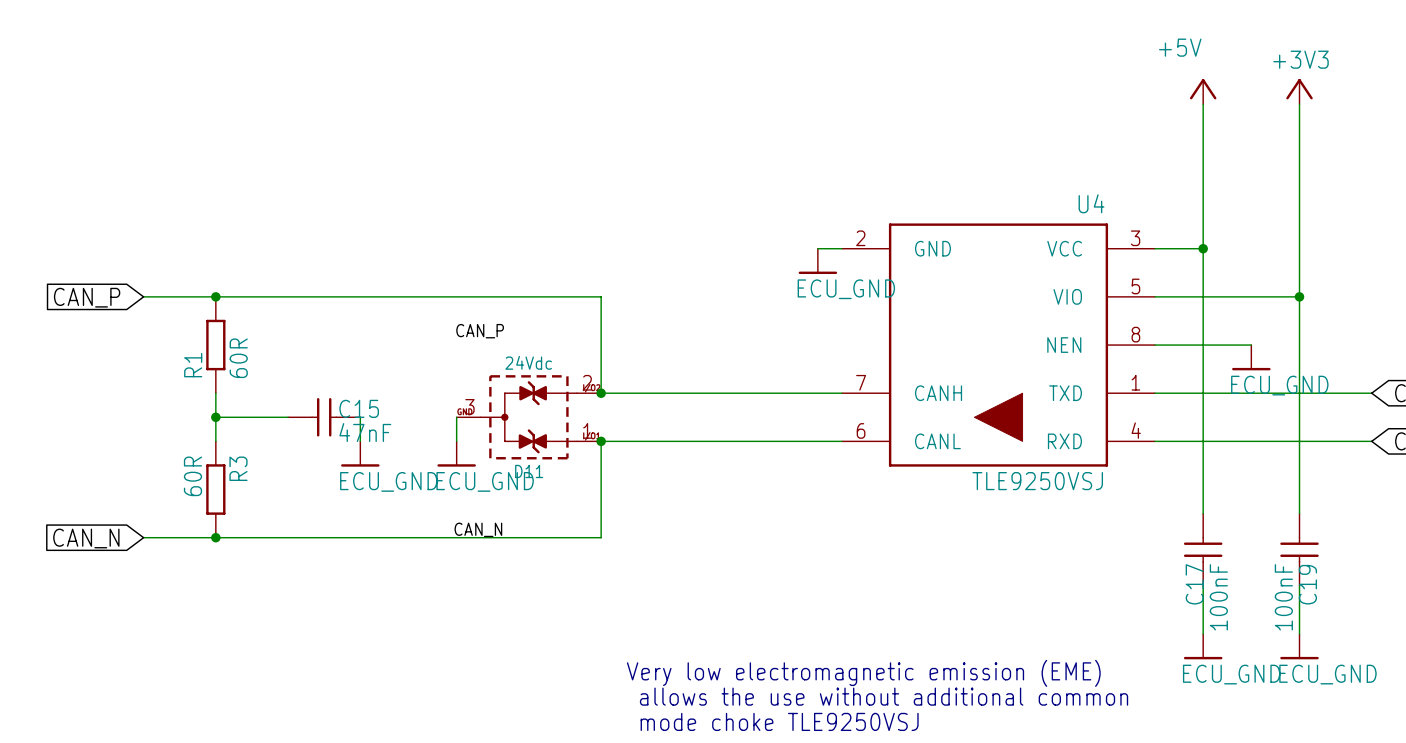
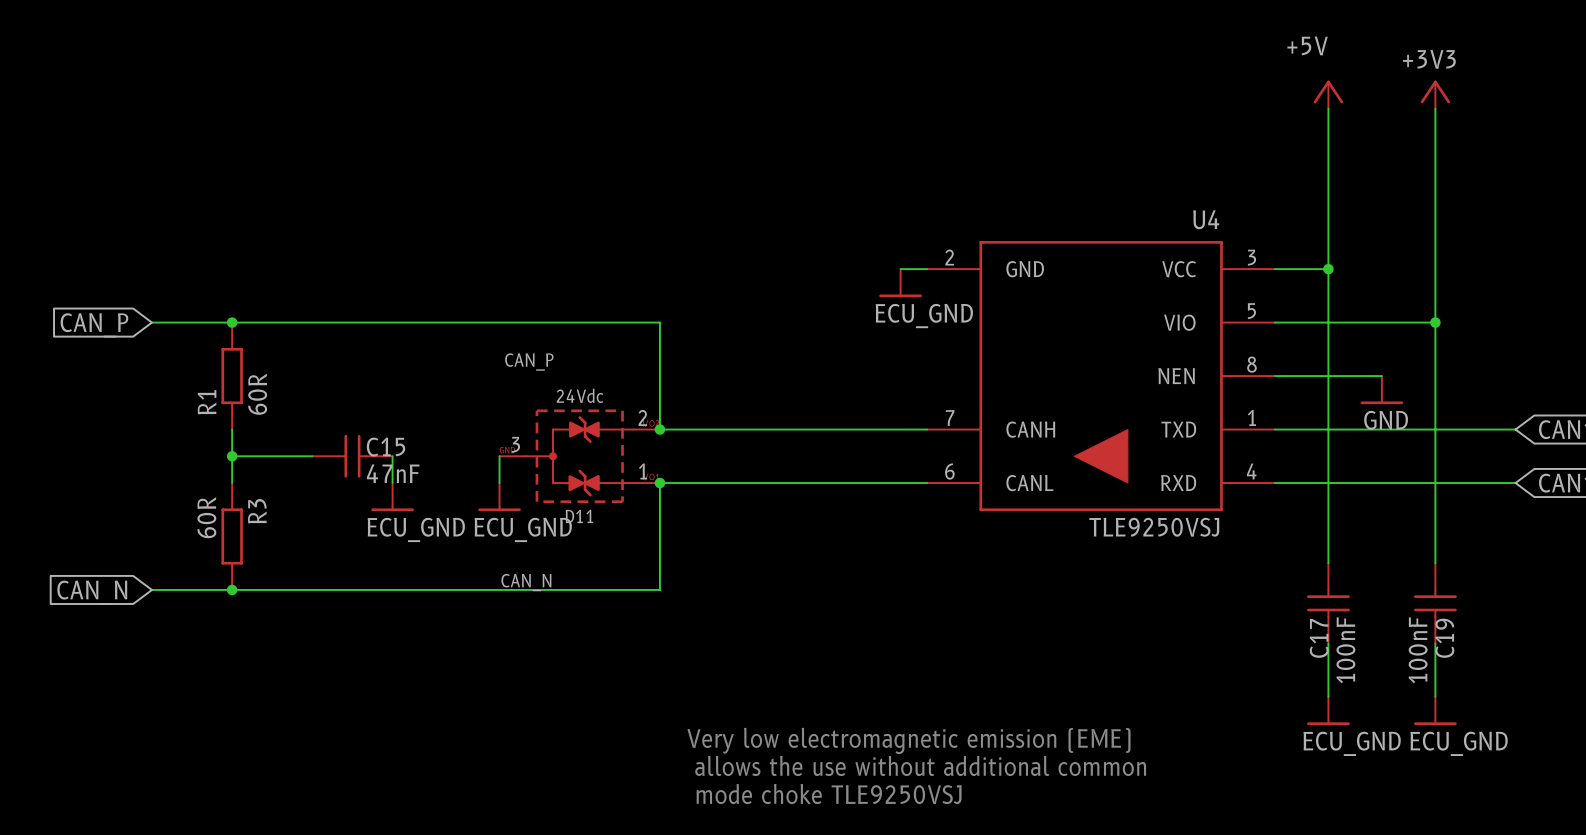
power symbol: ECU_GND (1251, 357) -> GND (1381, 390)

